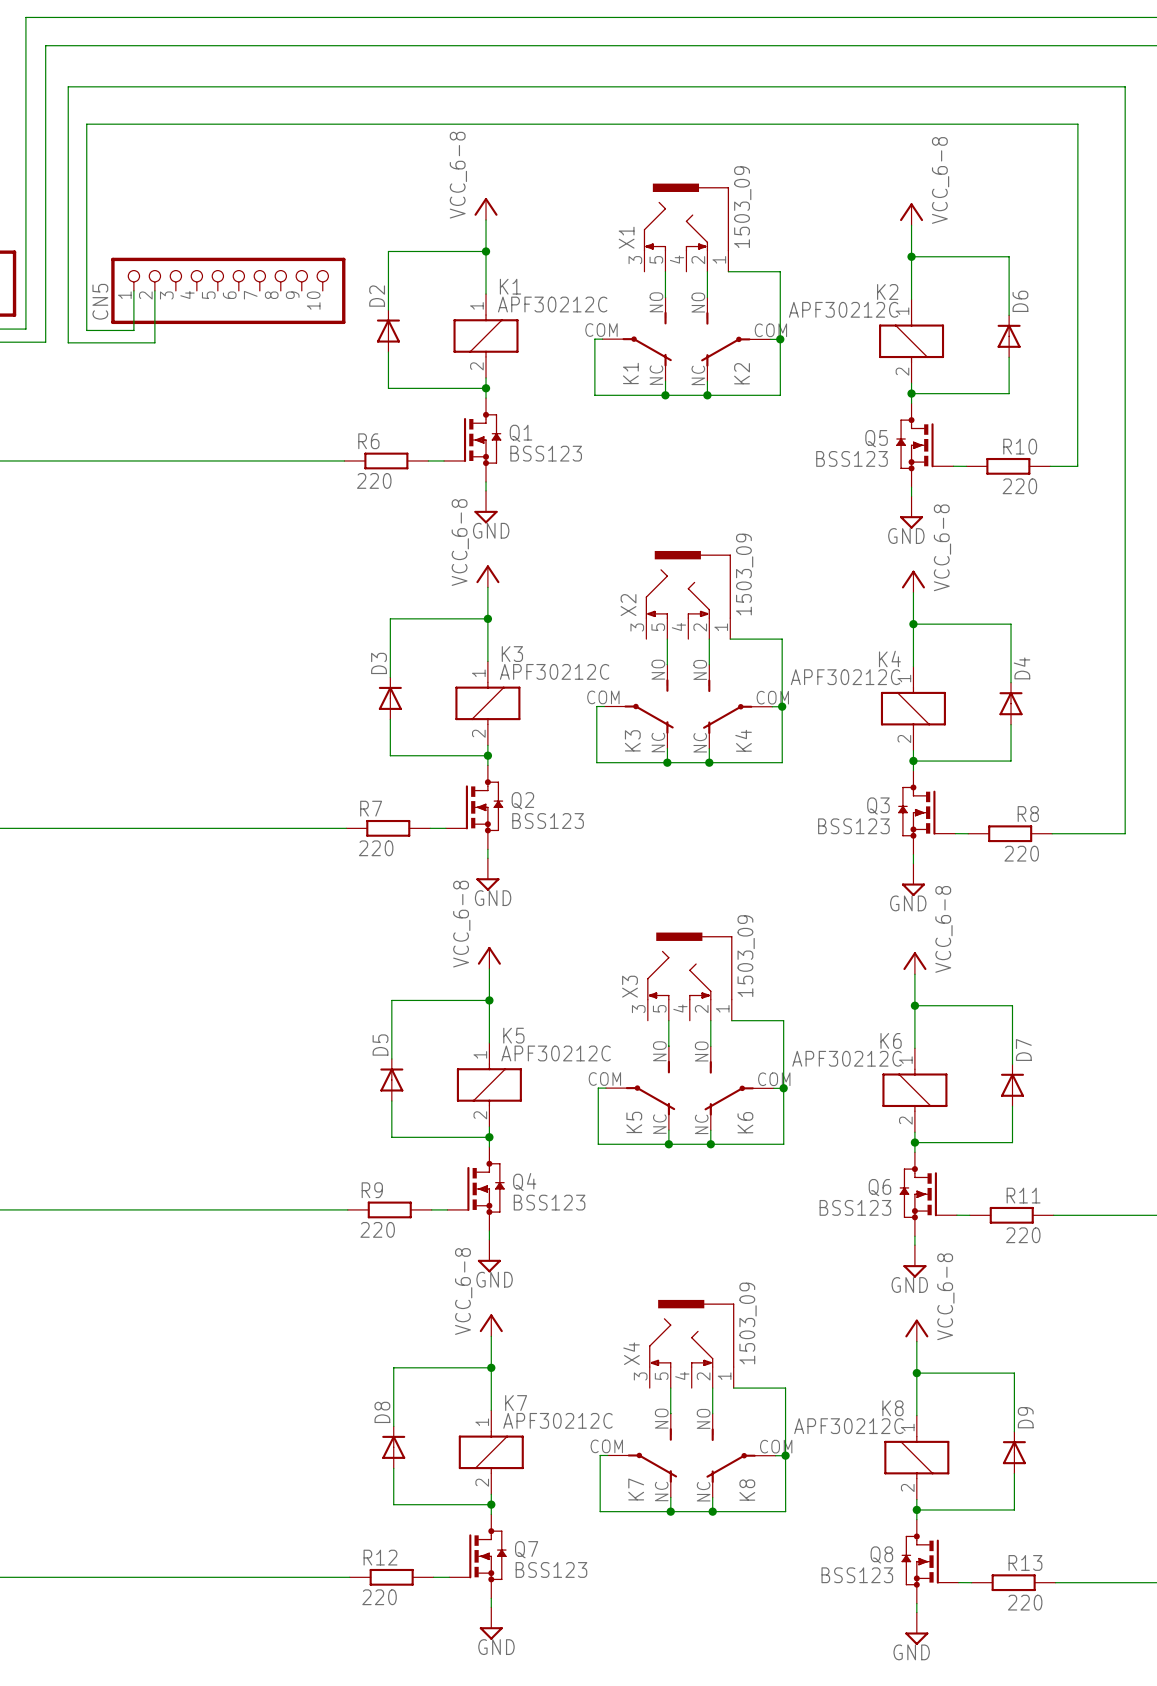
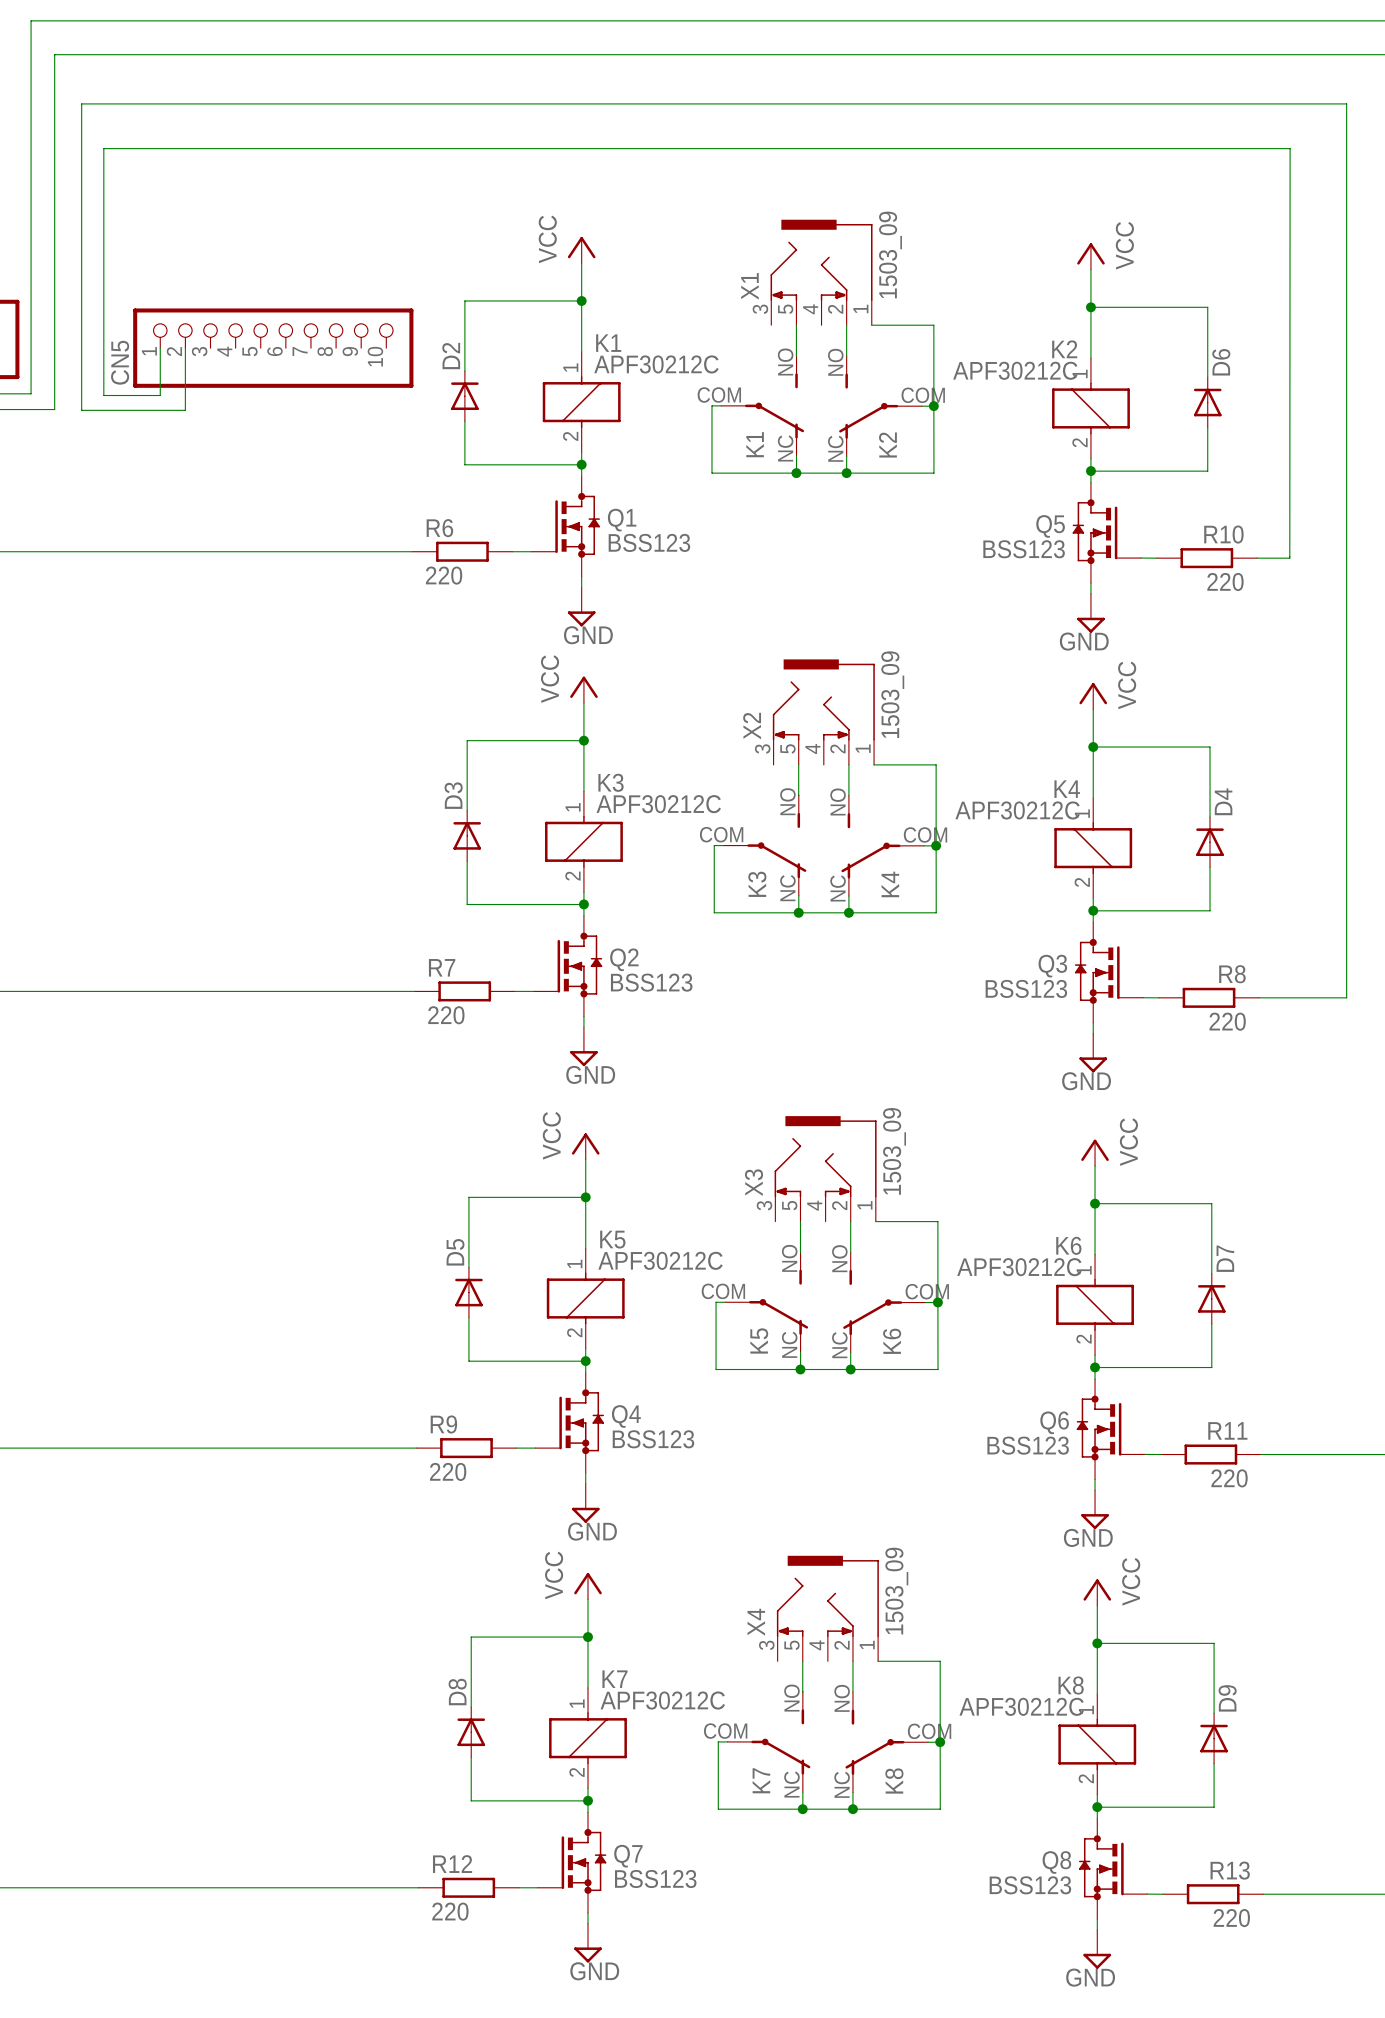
power symbol: VCC_6-8 (486, 208) -> VCC (581, 250)
power symbol: VCC_6-8 (911, 214) -> VCC (1090, 256)
power symbol: VCC_6-8 (487, 576) -> VCC (583, 689)
power symbol: VCC_6-8 (913, 581) -> VCC (1093, 696)
power symbol: VCC_6-8 (489, 957) -> VCC (585, 1146)
power symbol: VCC_6-8 (914, 963) -> VCC (1095, 1152)
power symbol: VCC_6-8 (491, 1325) -> VCC (588, 1586)
power symbol: VCC_6-8 (916, 1330) -> VCC (1097, 1592)

